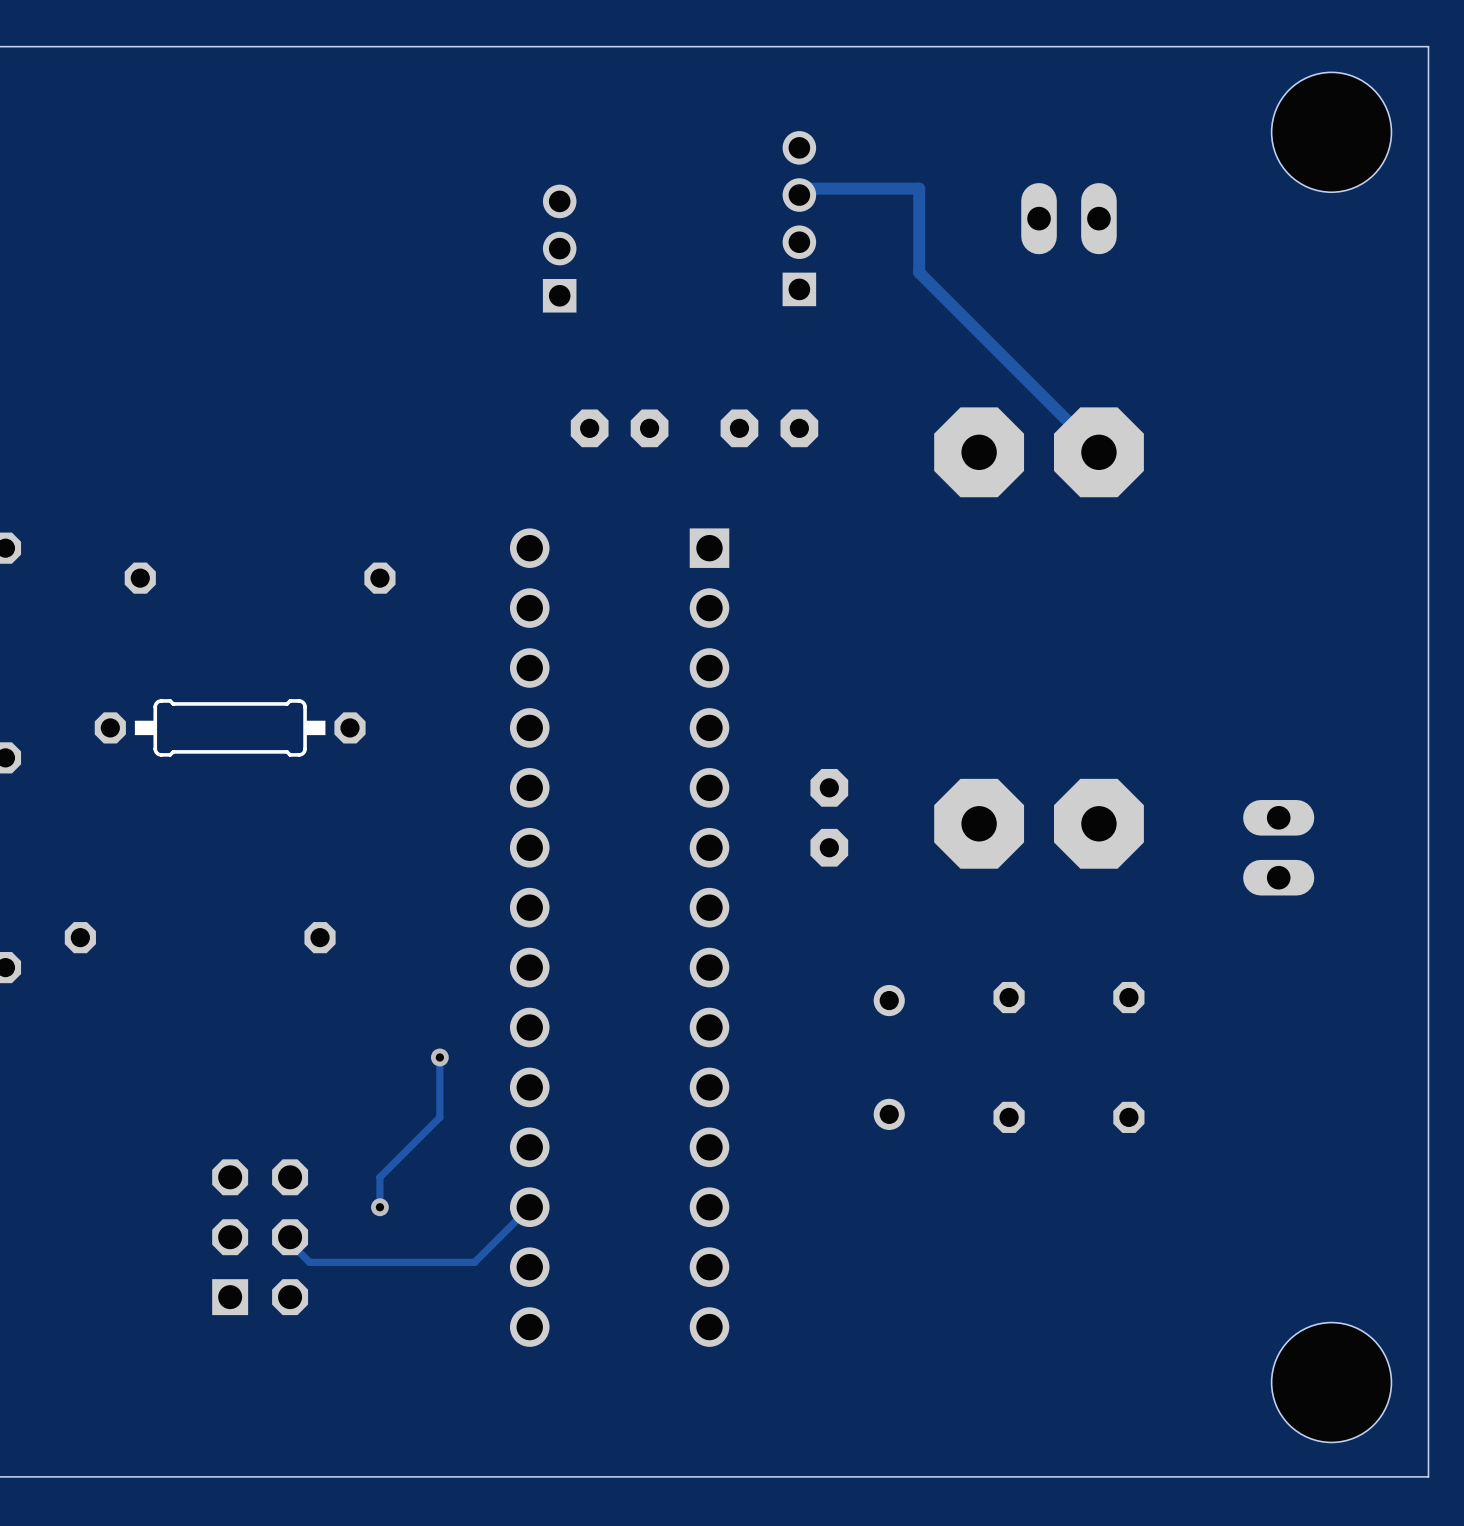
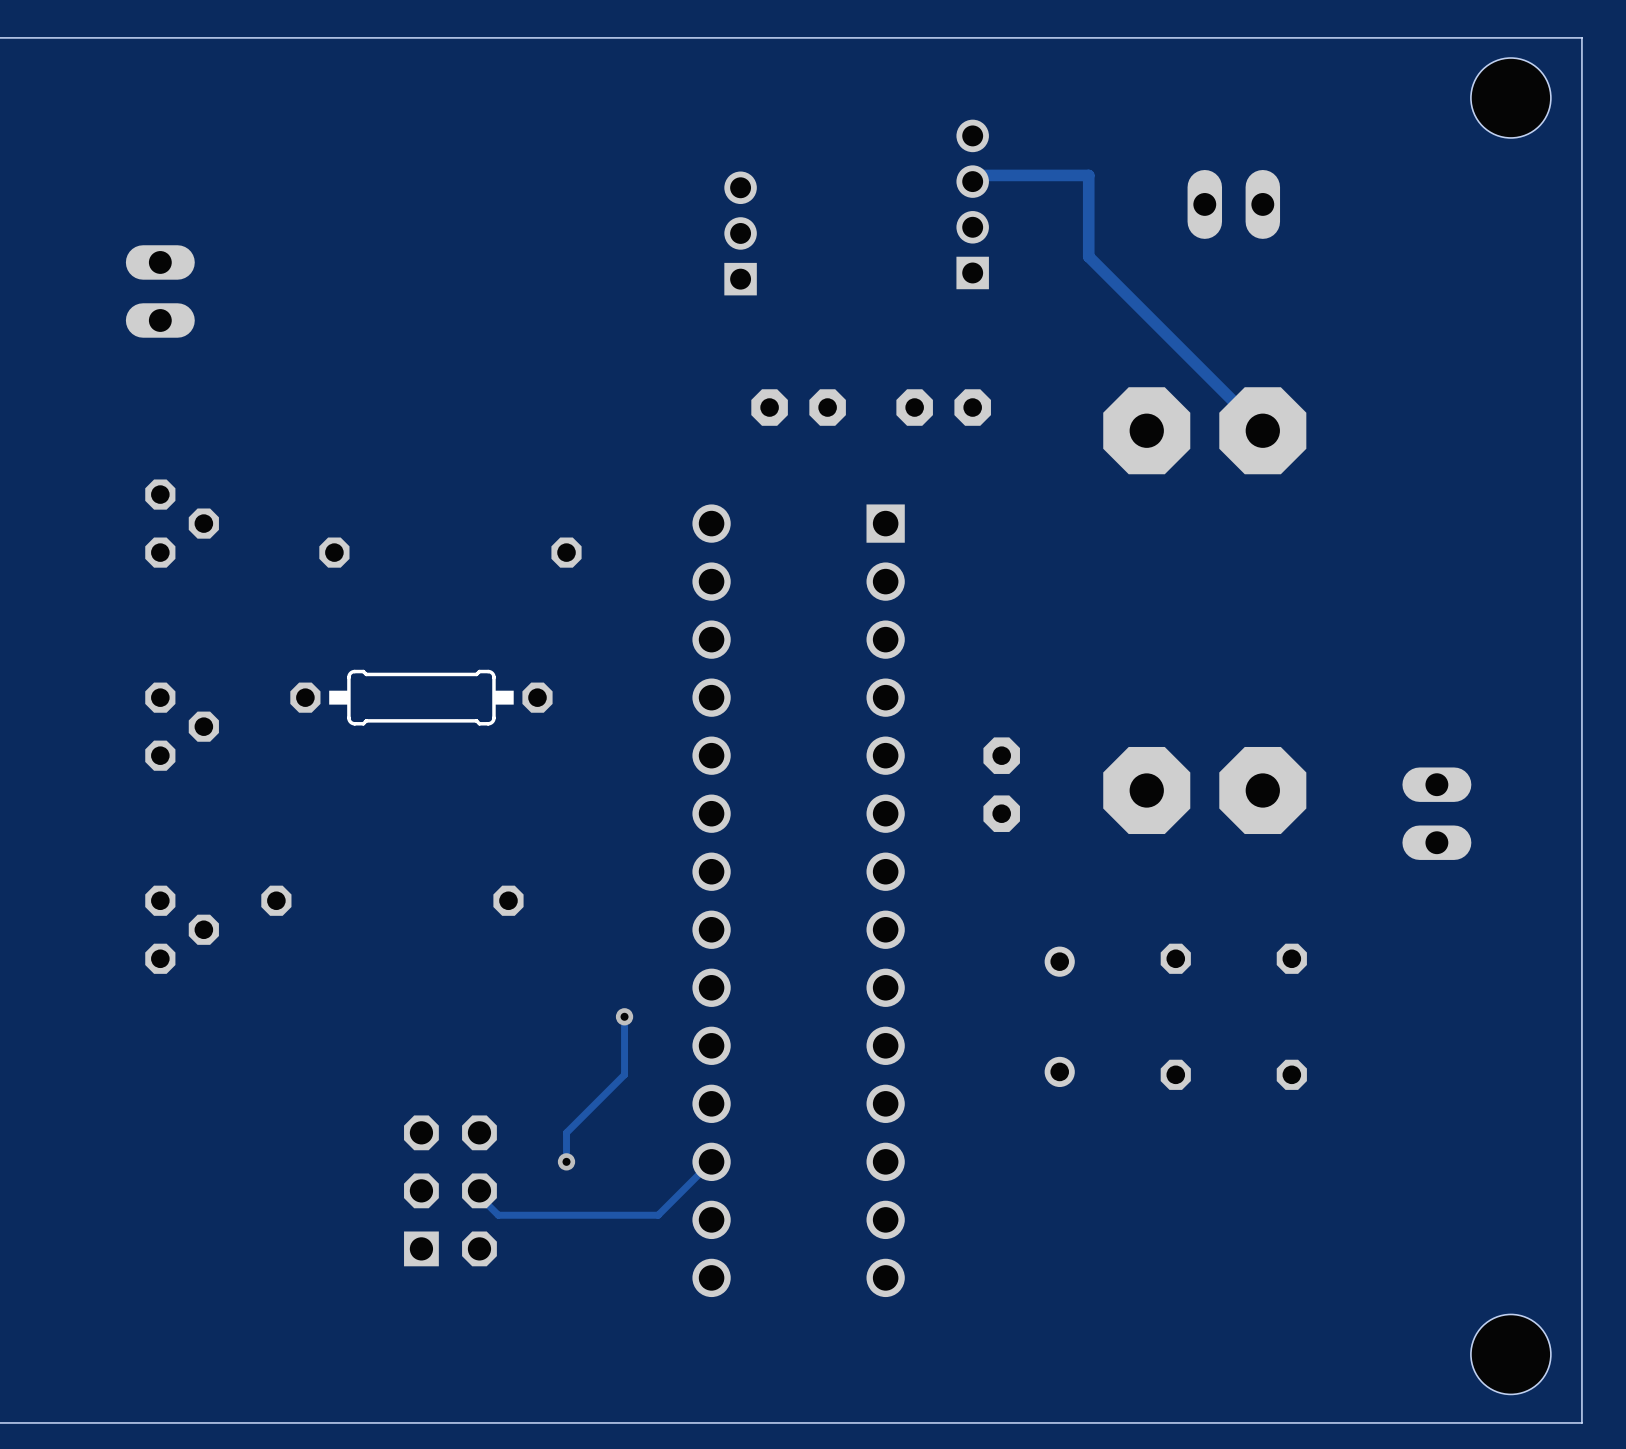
hole: none -> (1510, 97)
hole: (1331, 132) -> none
hole: (1331, 1382) -> none
hole: none -> (1510, 1354)

